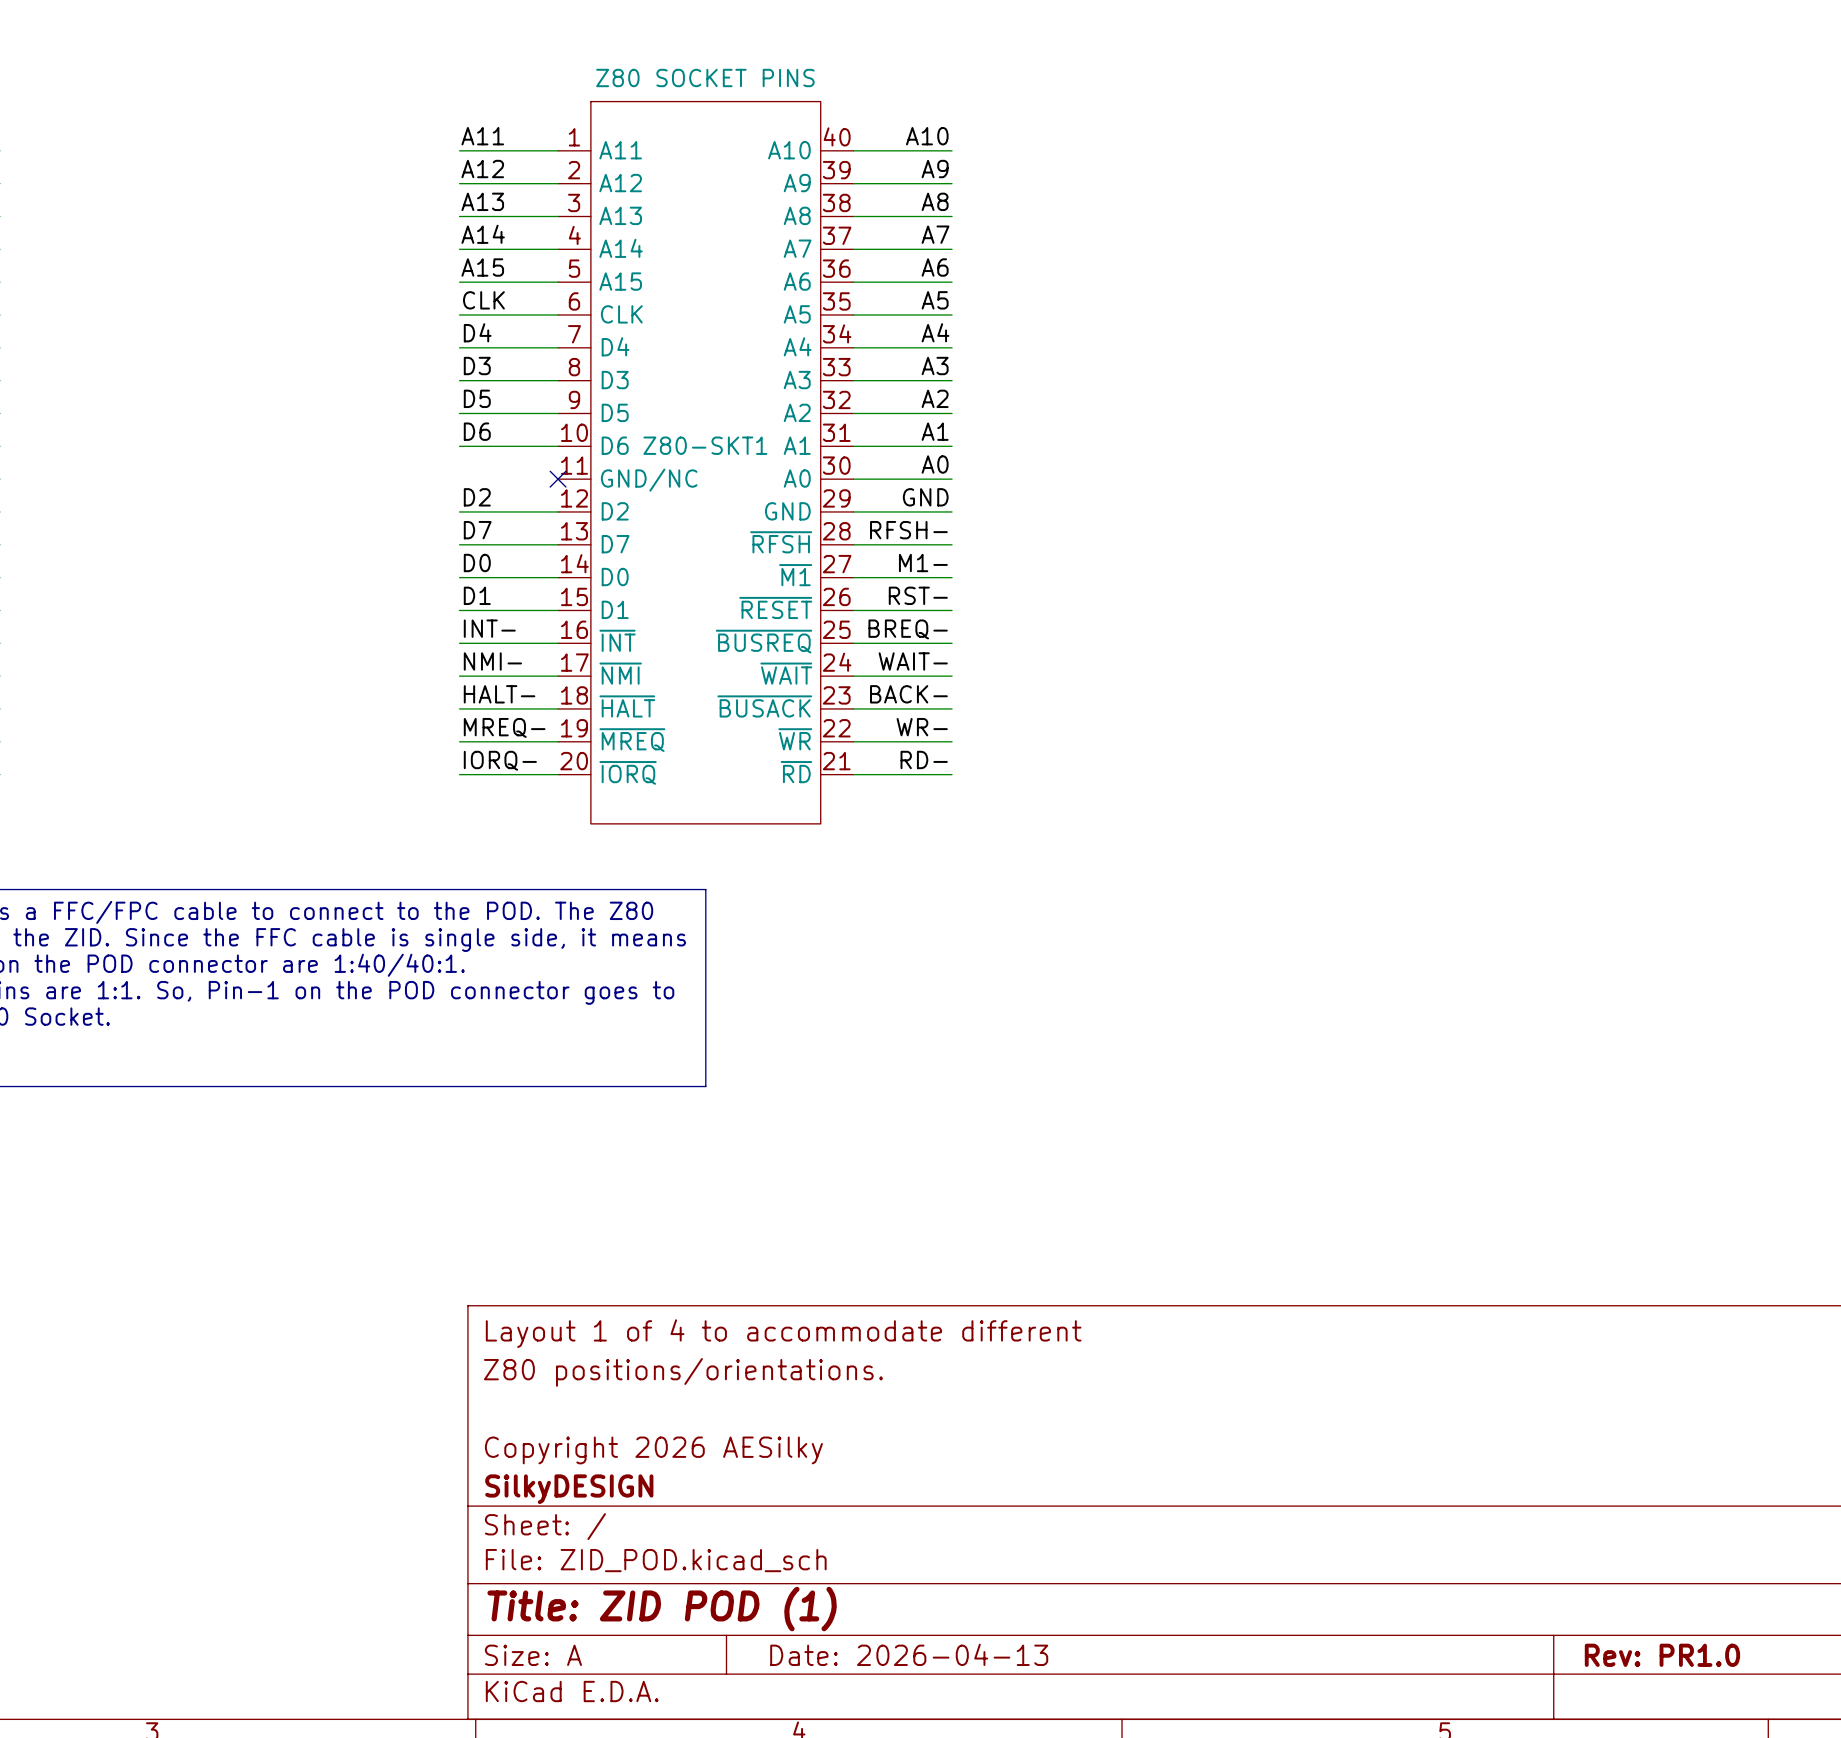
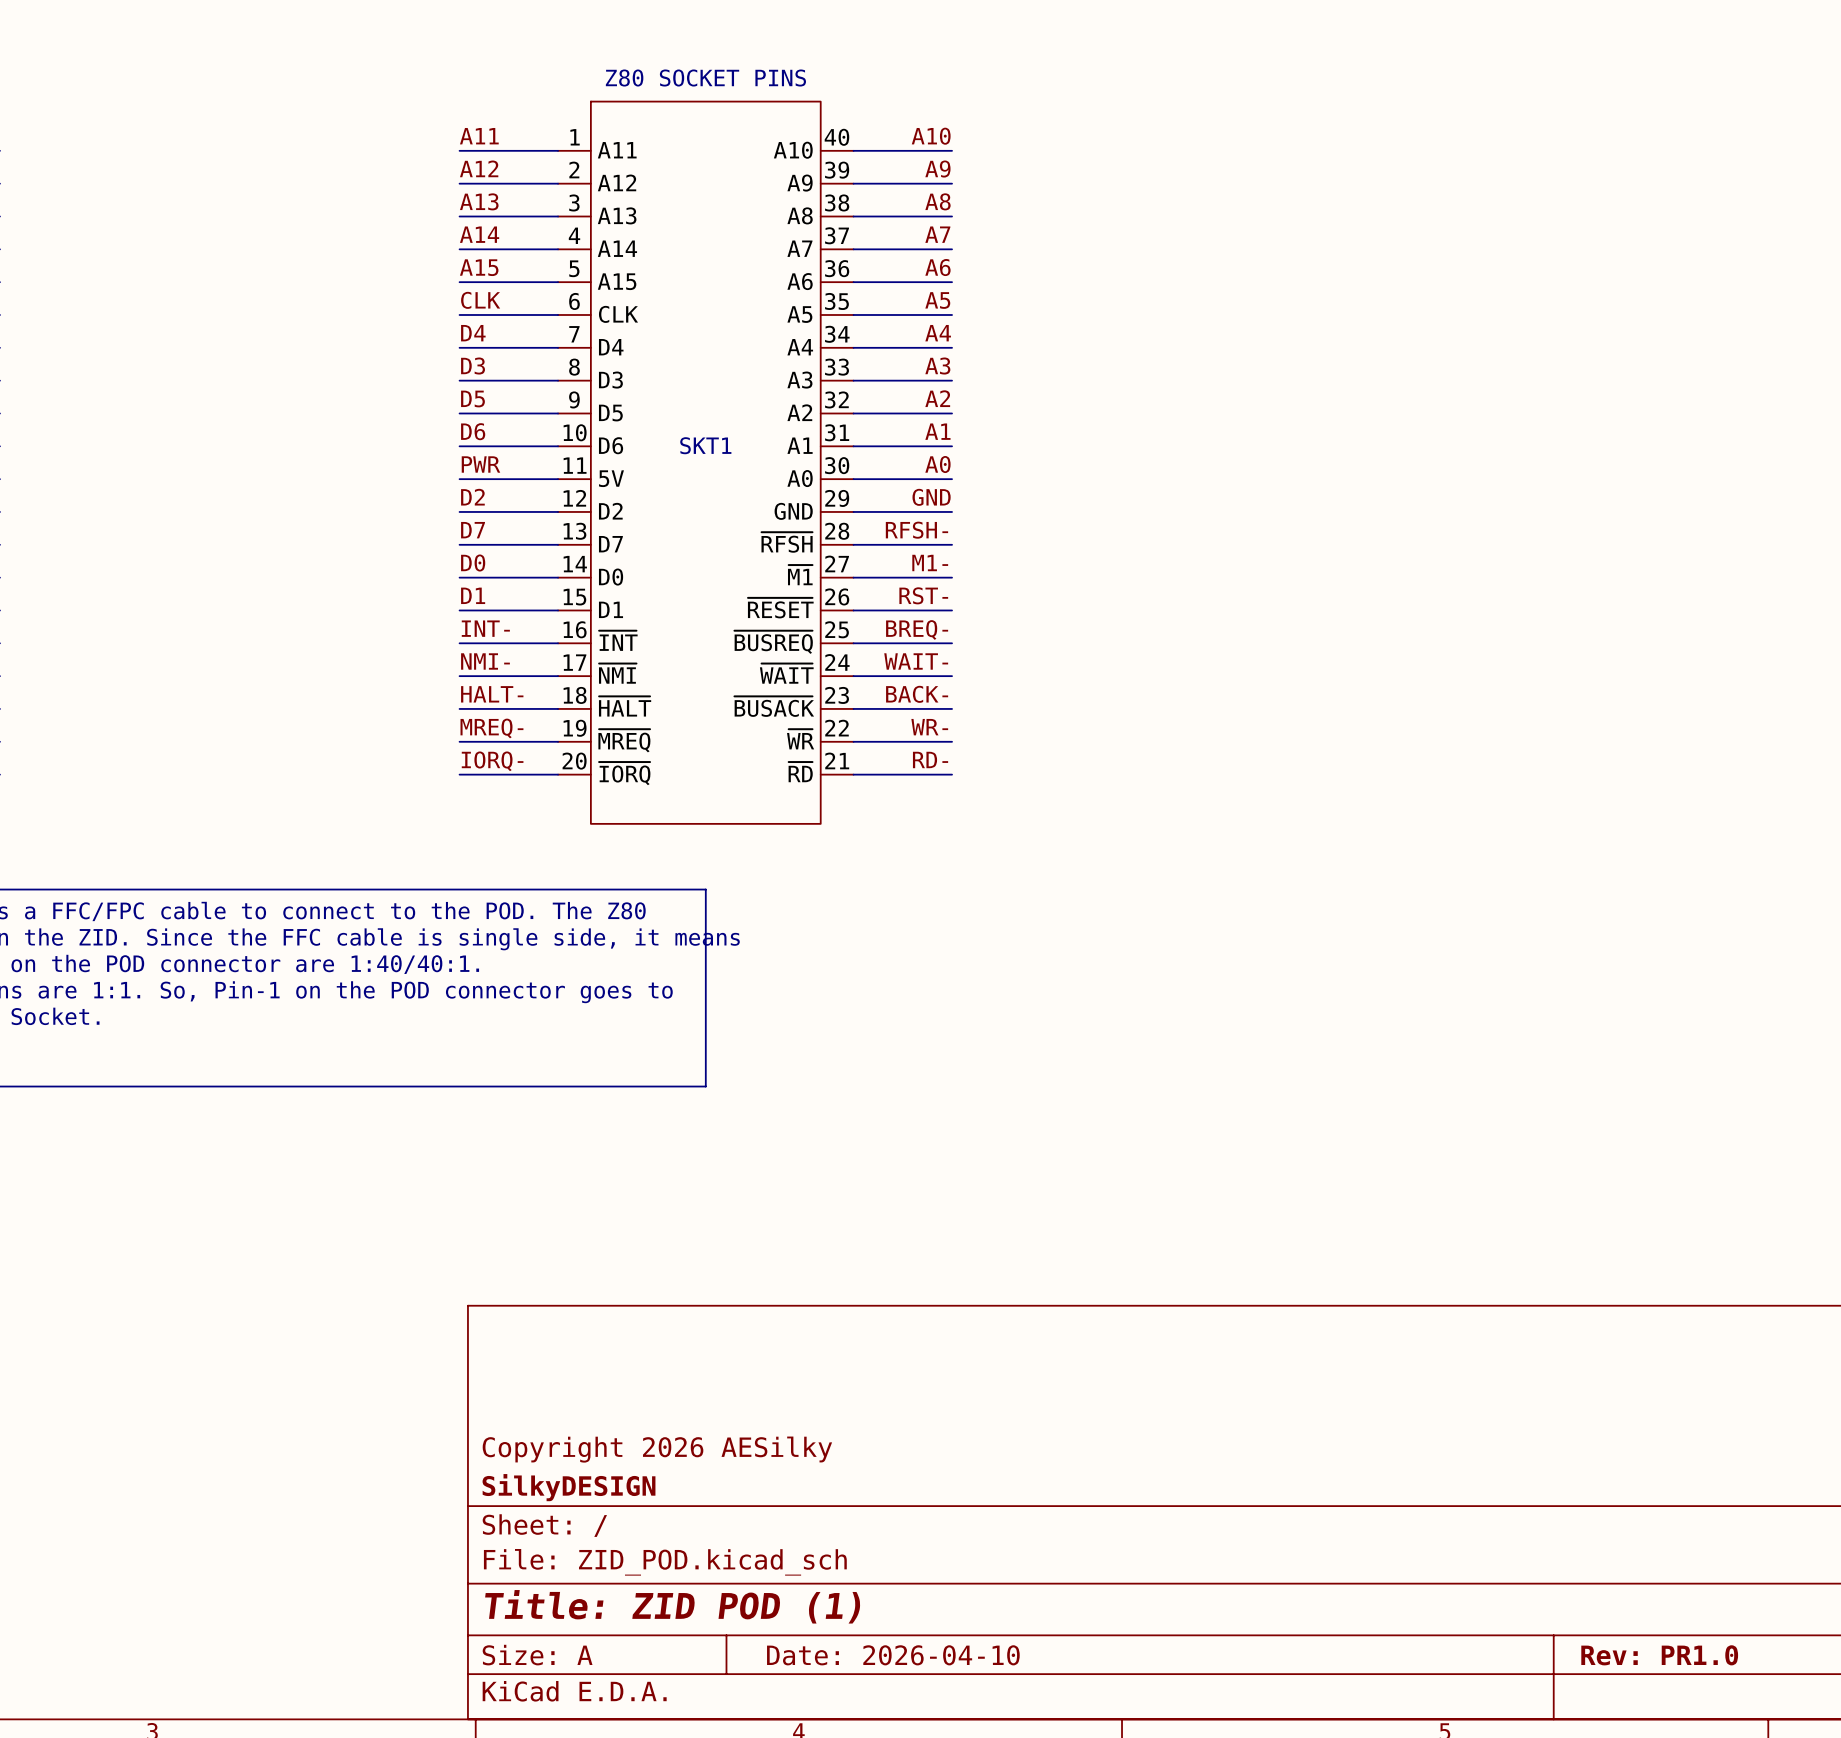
Z80-SKT1 name: Z80-SKT1 (705, 445) -> SKT1 (705, 445)
label: none -> PWR (480, 464)
wire: none -> (459, 479) (558, 479)
no-connect mark: (558, 479) -> none
Z80-SKT1 pin name: GND/NC (649, 480) -> 5V (611, 478)
title block: Layout 1 of 4 to accommodate different (783, 1333) -> none
title block: Z80 positions/orientations. (683, 1372) -> none
title block: Date: 2026-04-13 (909, 1654) -> Date: 2026-04-10 (893, 1655)

